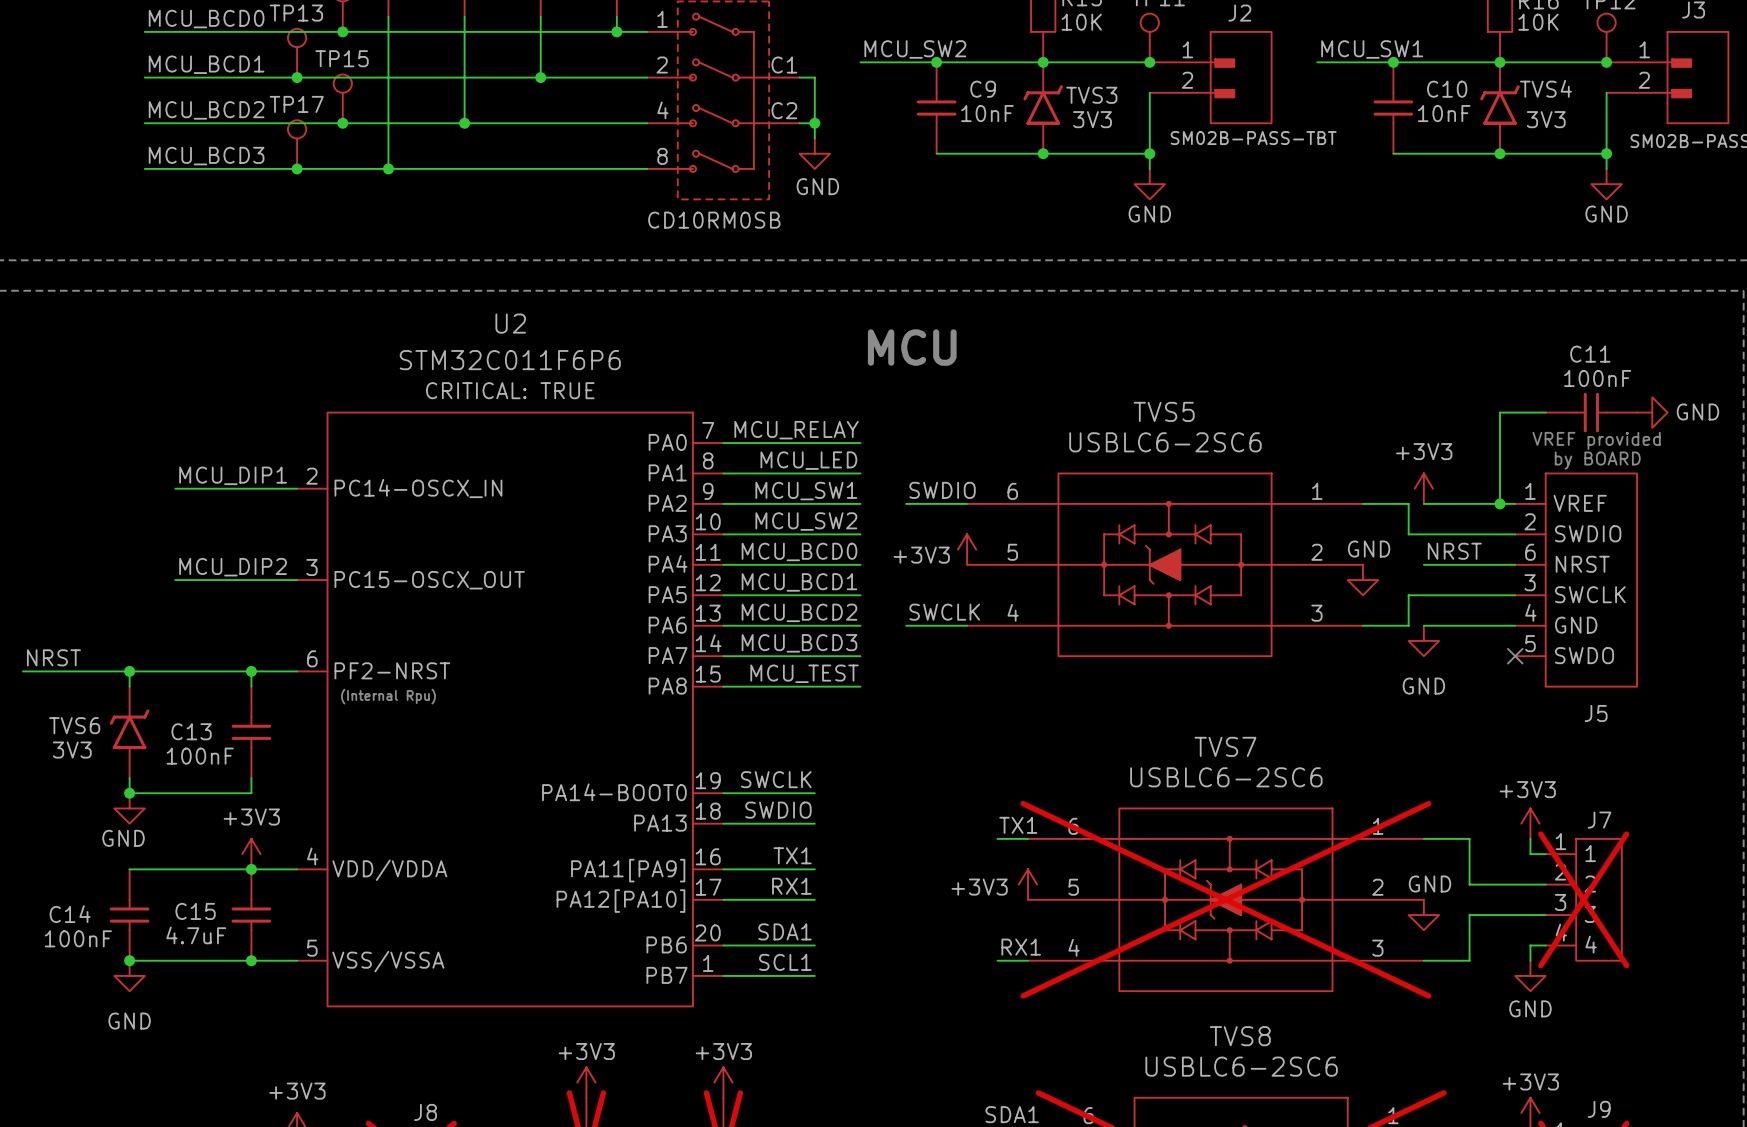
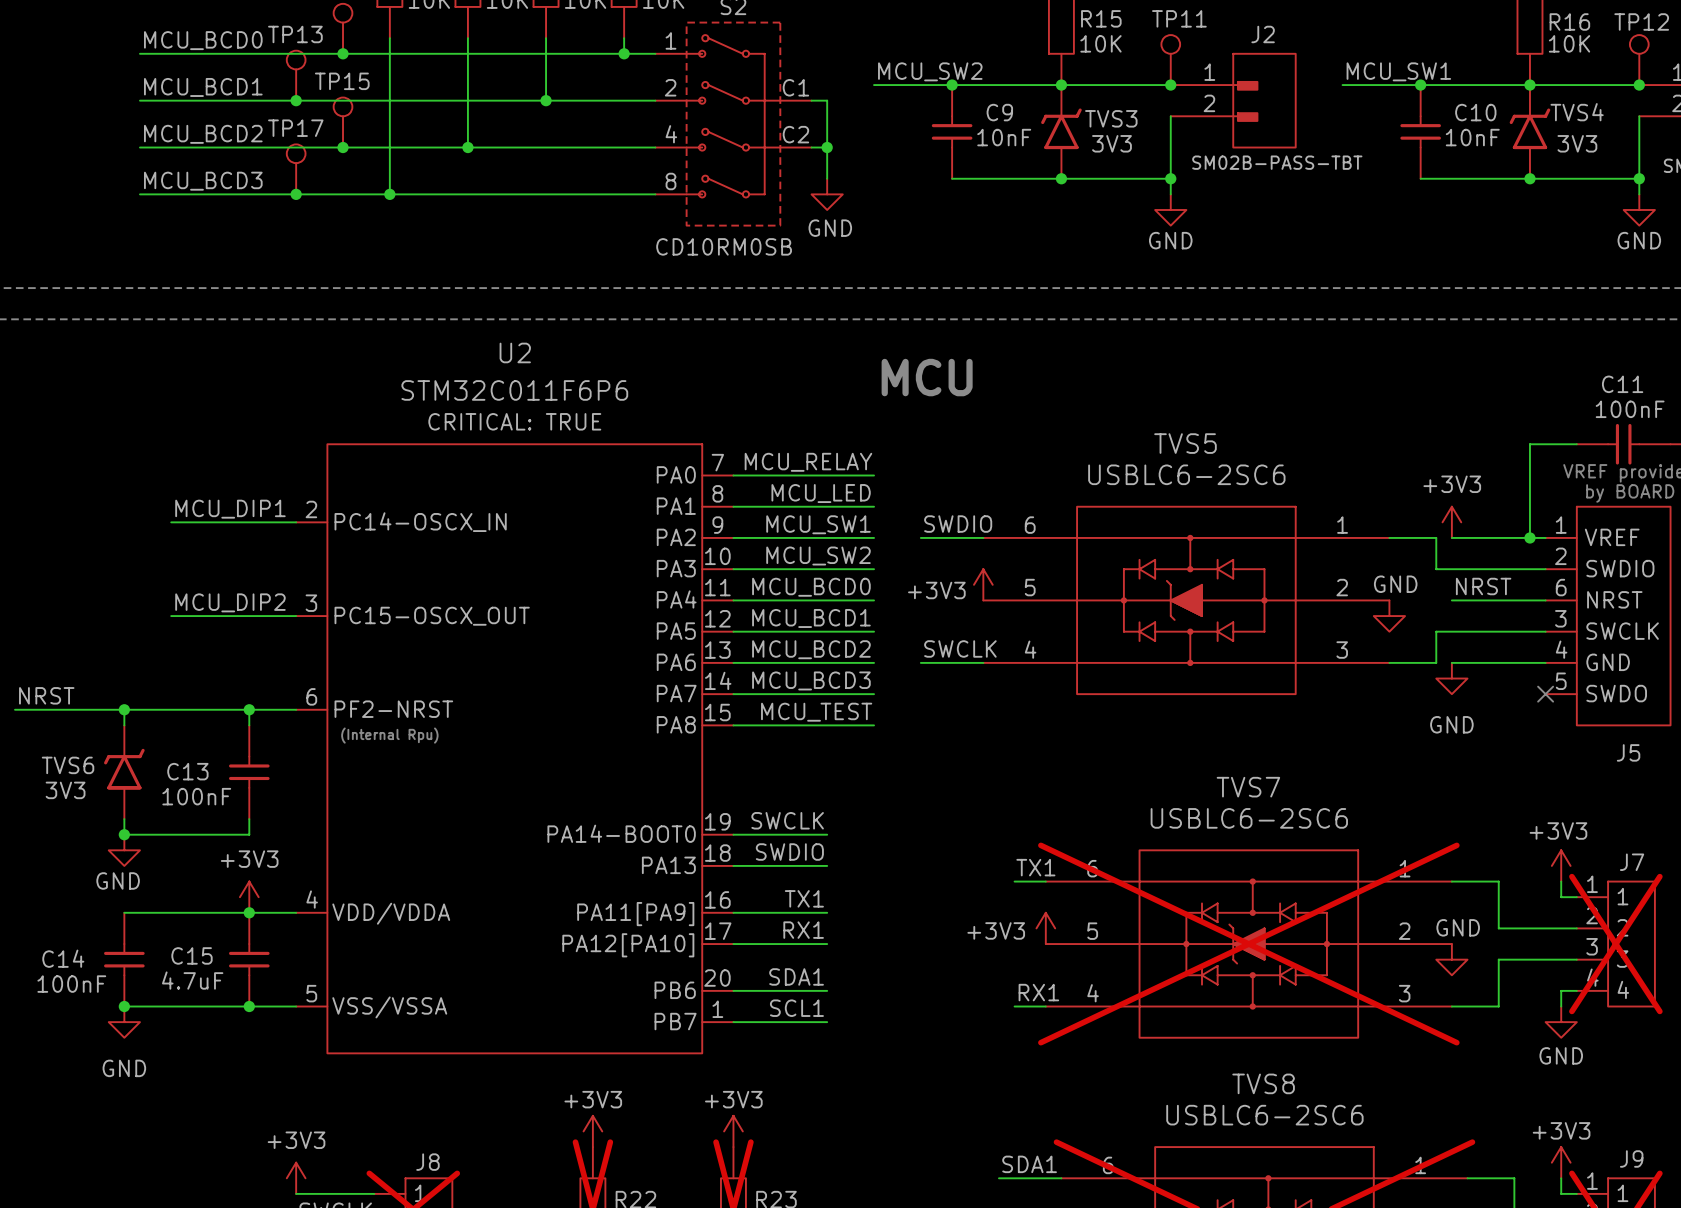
power symbol position: GND (814, 153) -> GND (827, 194)

